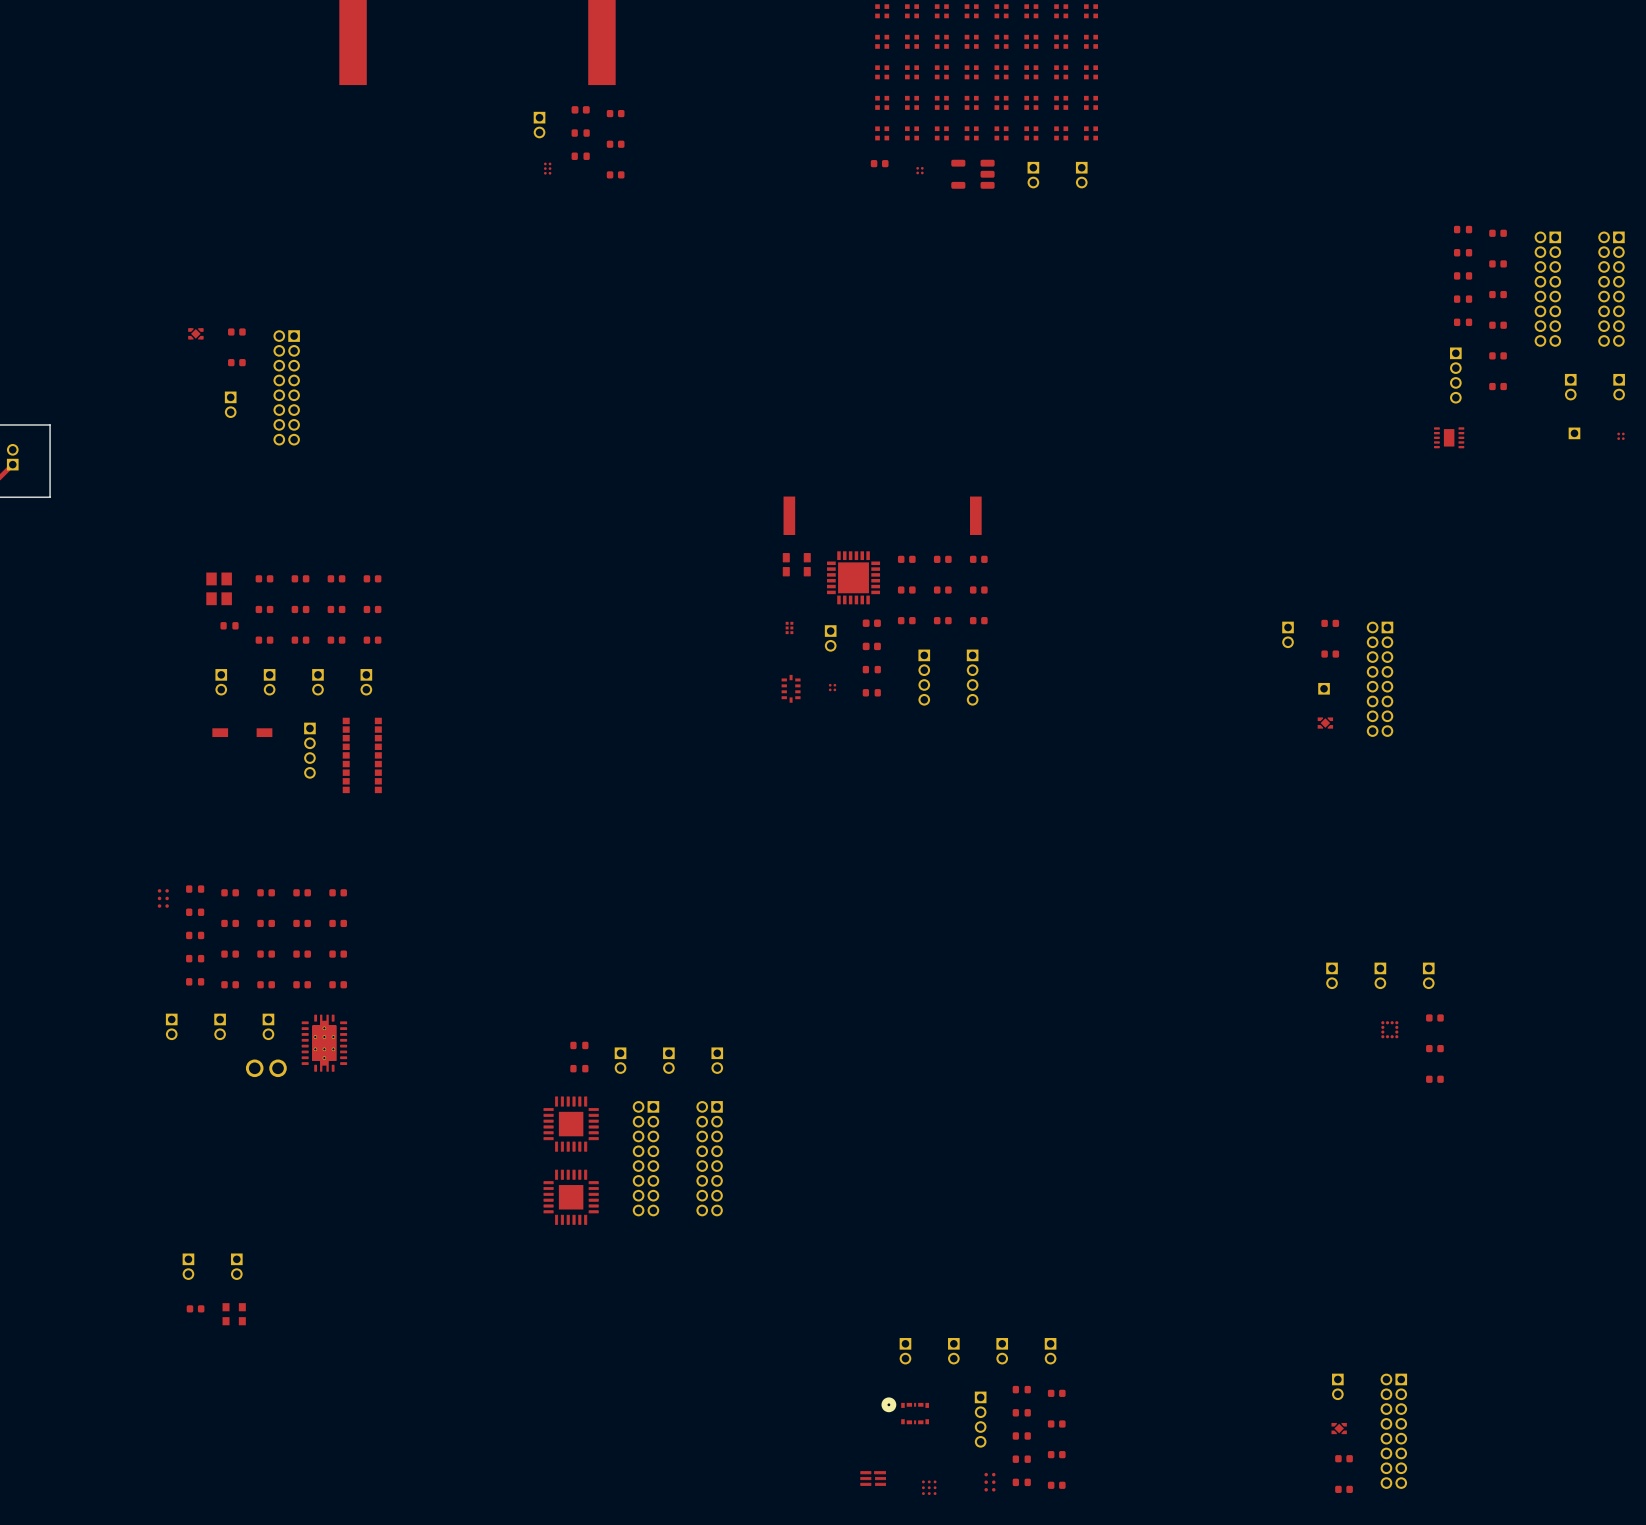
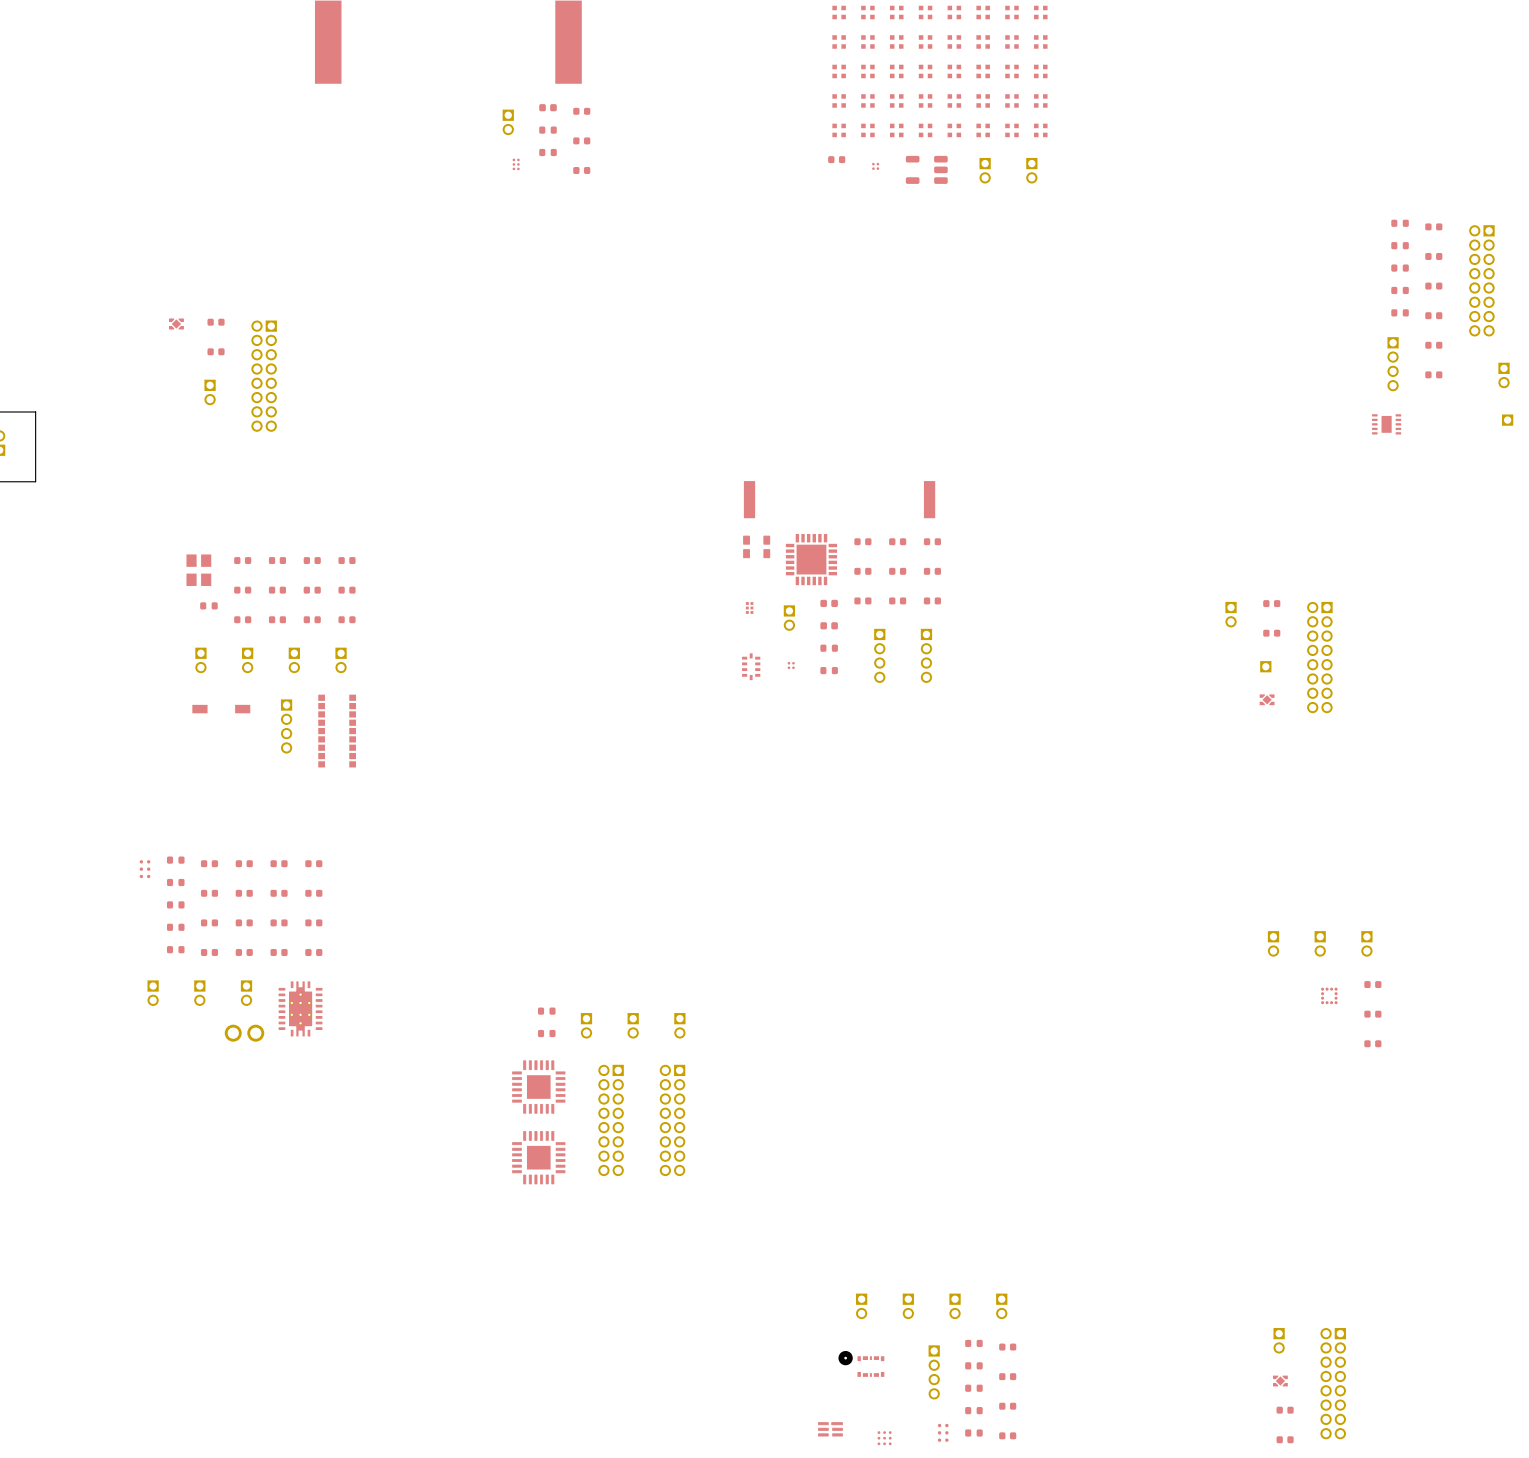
part: (188, 1266) -> none
part: (236, 1266) -> none
part: (195, 1308) -> none
part: (234, 1314) -> none

